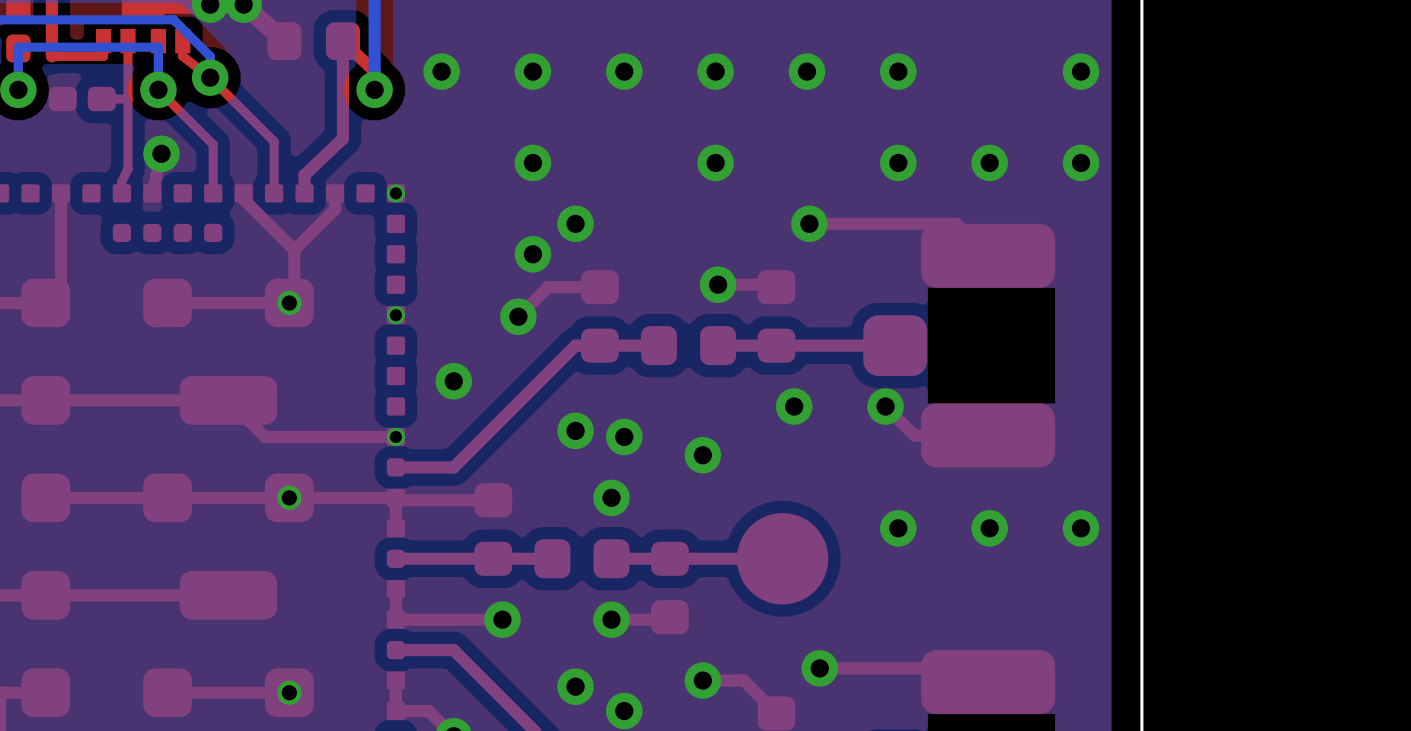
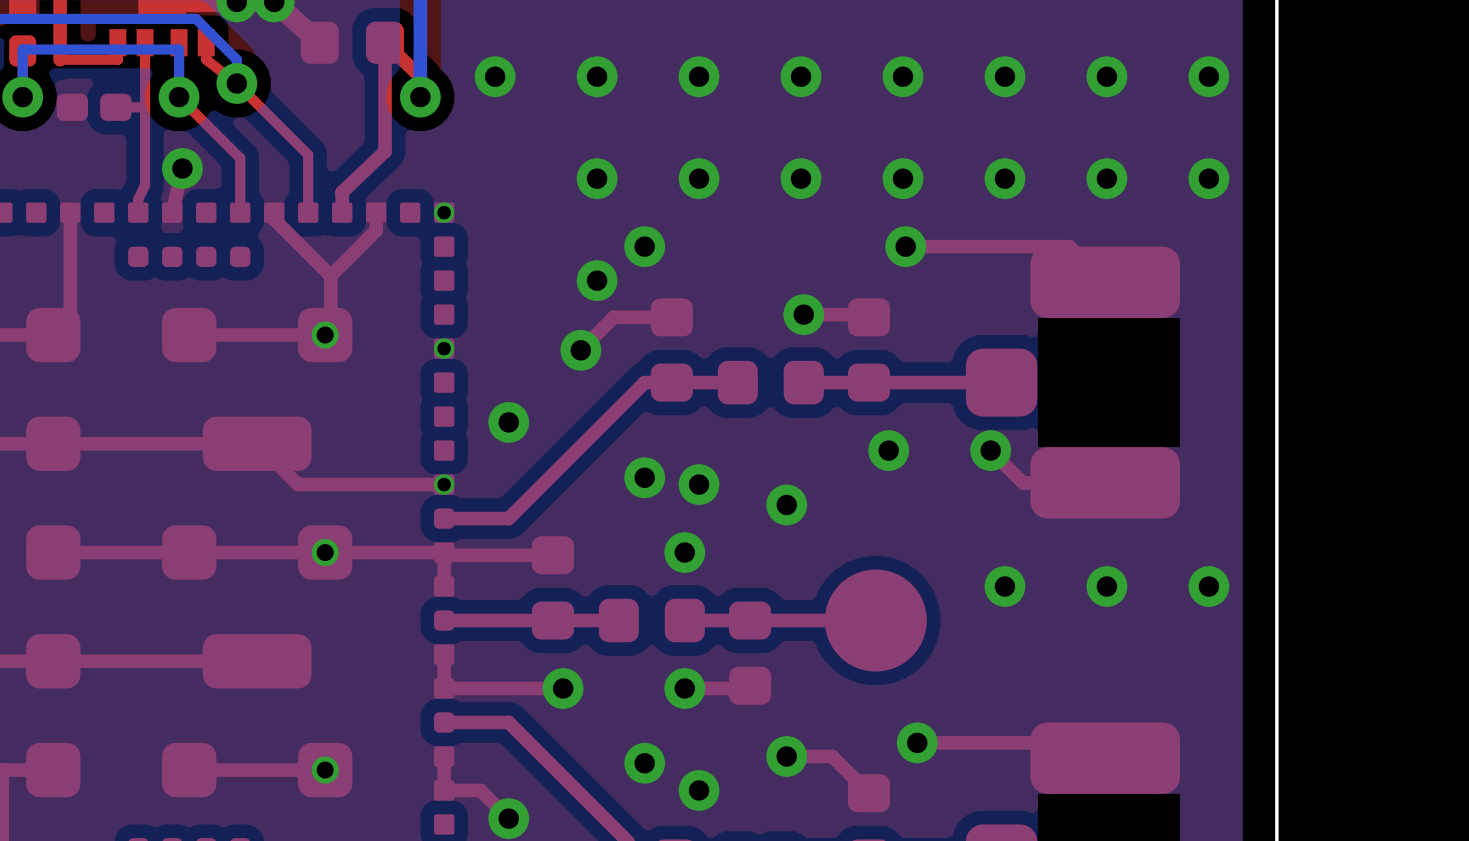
via: none -> (1106, 76)
via: none -> (699, 178)
via: none -> (902, 178)

